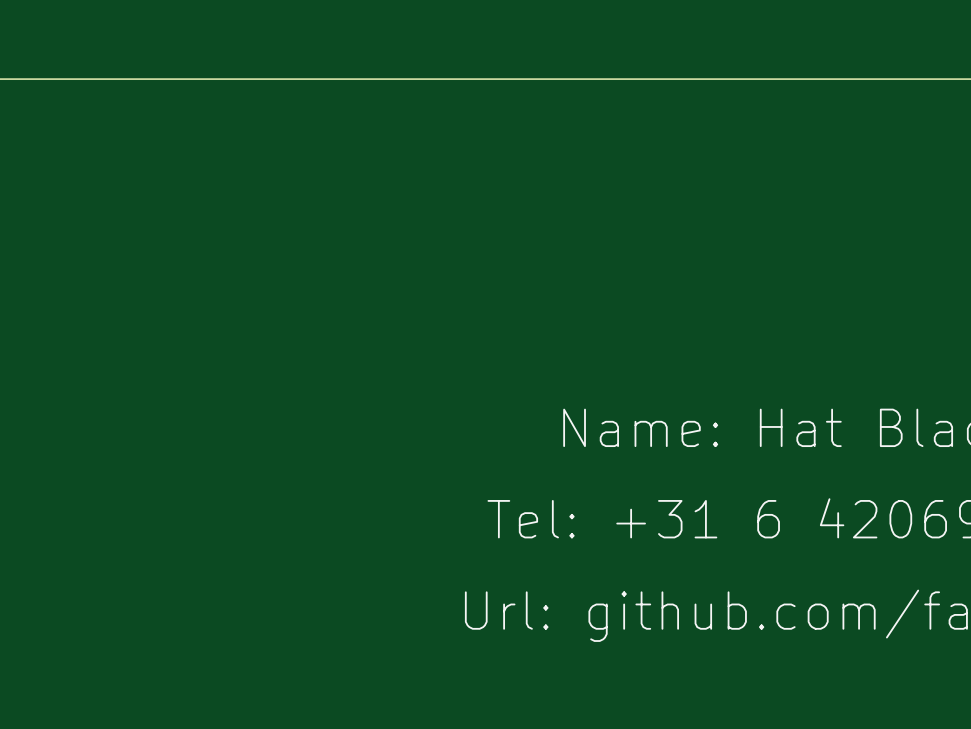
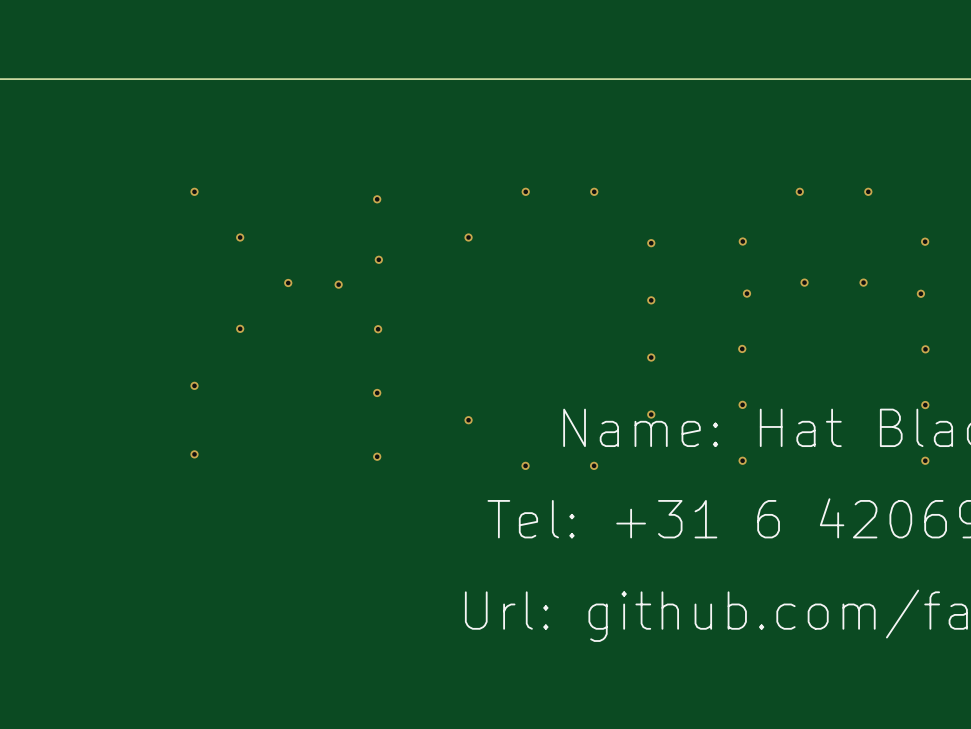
via: none -> (194, 191)
via: none -> (525, 191)
via: none -> (594, 191)
via: none -> (799, 191)
via: none -> (868, 191)
via: none -> (377, 199)
via: none -> (240, 237)
via: none -> (468, 237)
via: none -> (742, 241)
via: none -> (925, 241)
via: none -> (651, 243)
via: none -> (378, 259)
via: none -> (288, 282)
via: none -> (804, 282)
via: none -> (863, 282)
via: none -> (338, 284)
via: none -> (746, 293)
via: none -> (920, 293)
via: none -> (651, 300)
via: none -> (240, 328)
via: none -> (378, 329)
via: none -> (742, 348)
via: none -> (925, 349)
via: none -> (651, 357)
via: none -> (194, 385)
via: none -> (377, 392)
via: none -> (742, 404)
via: none -> (925, 405)
via: none -> (651, 414)
via: none -> (468, 420)
via: none -> (194, 454)
via: none -> (377, 456)
via: none -> (742, 460)
via: none -> (925, 460)
via: none -> (525, 465)
via: none -> (594, 465)

